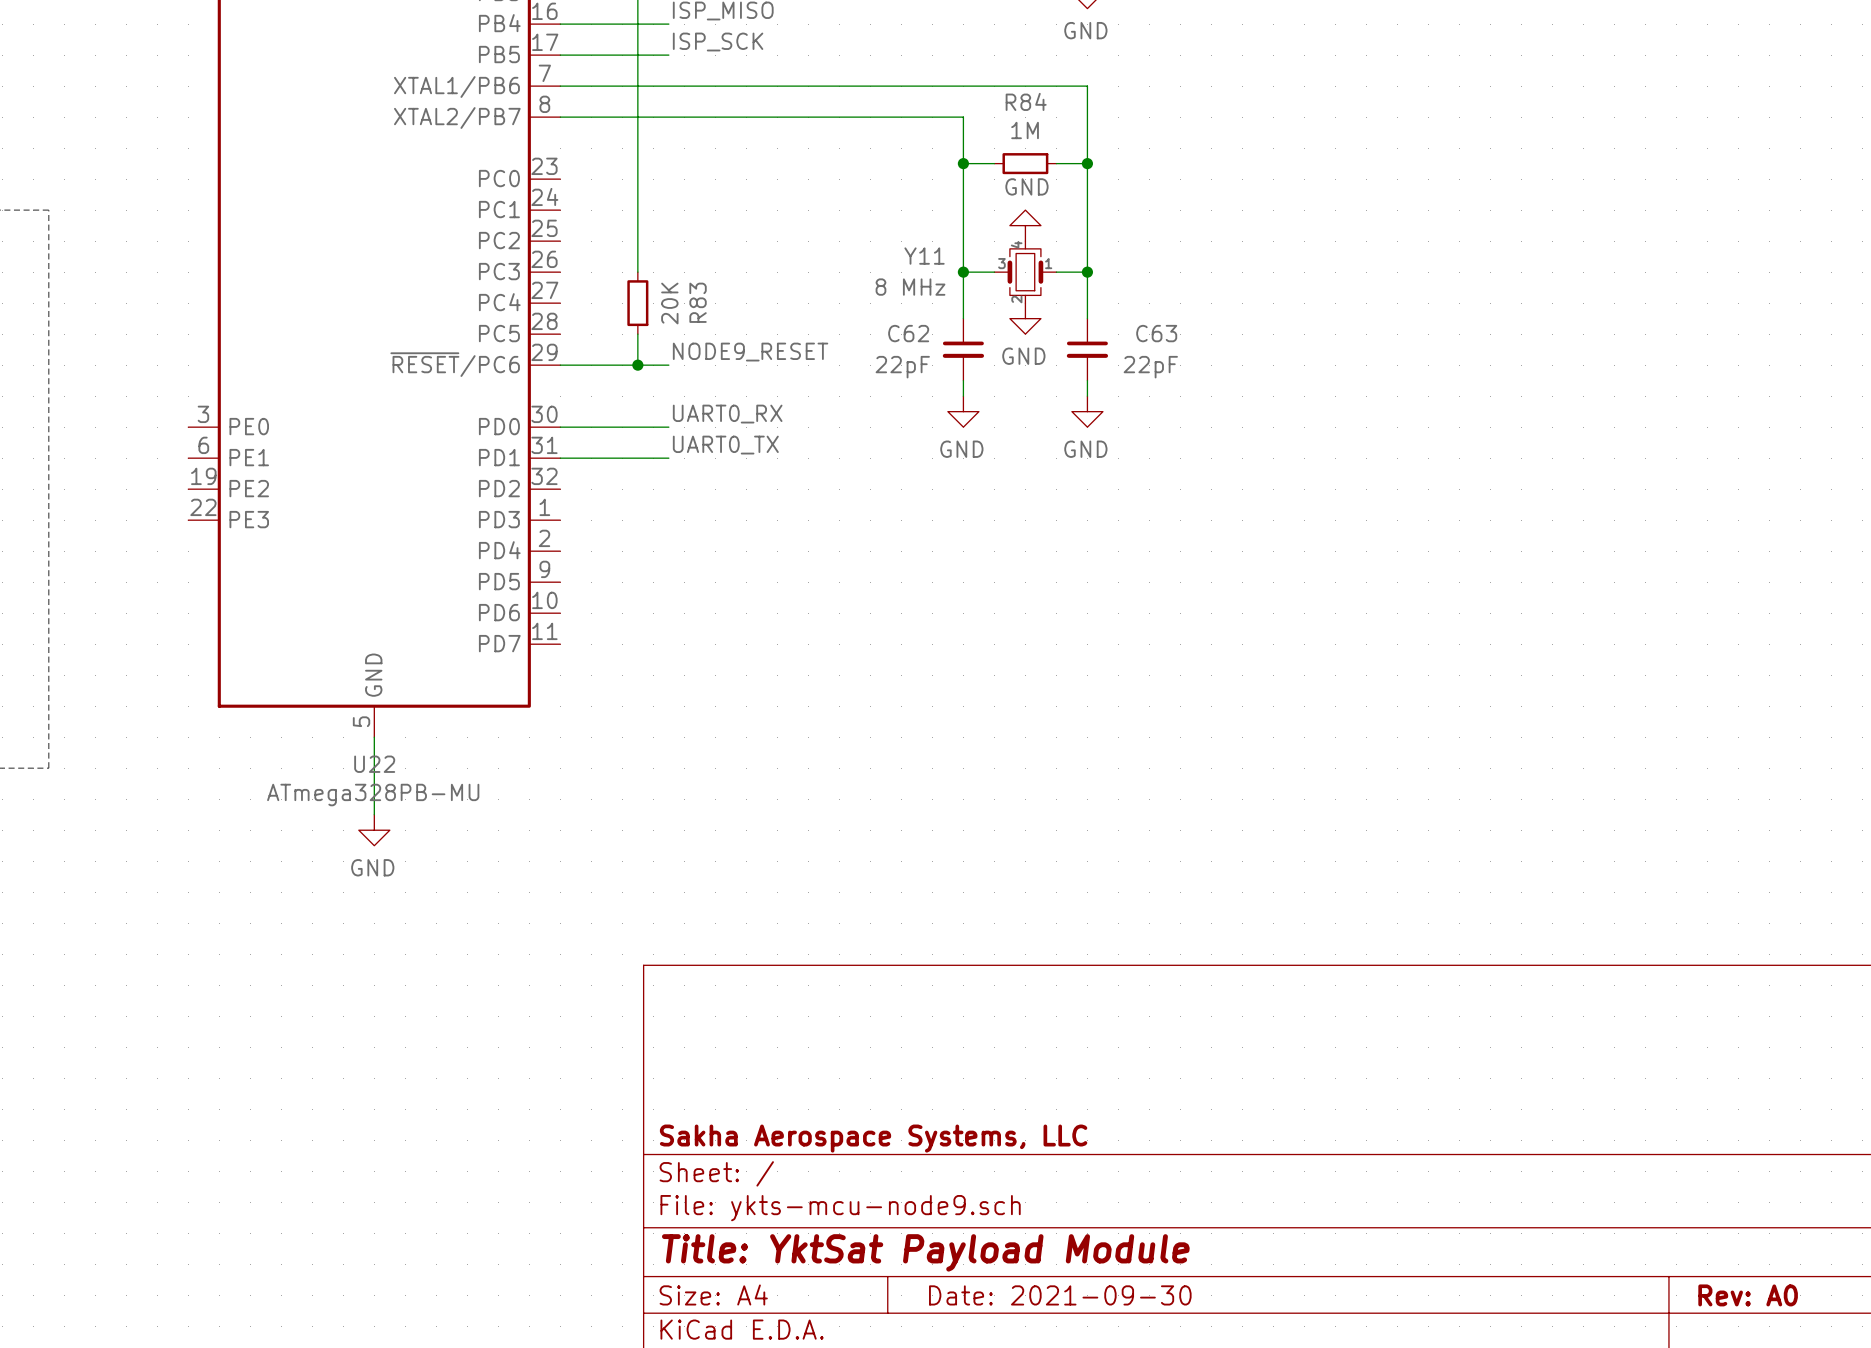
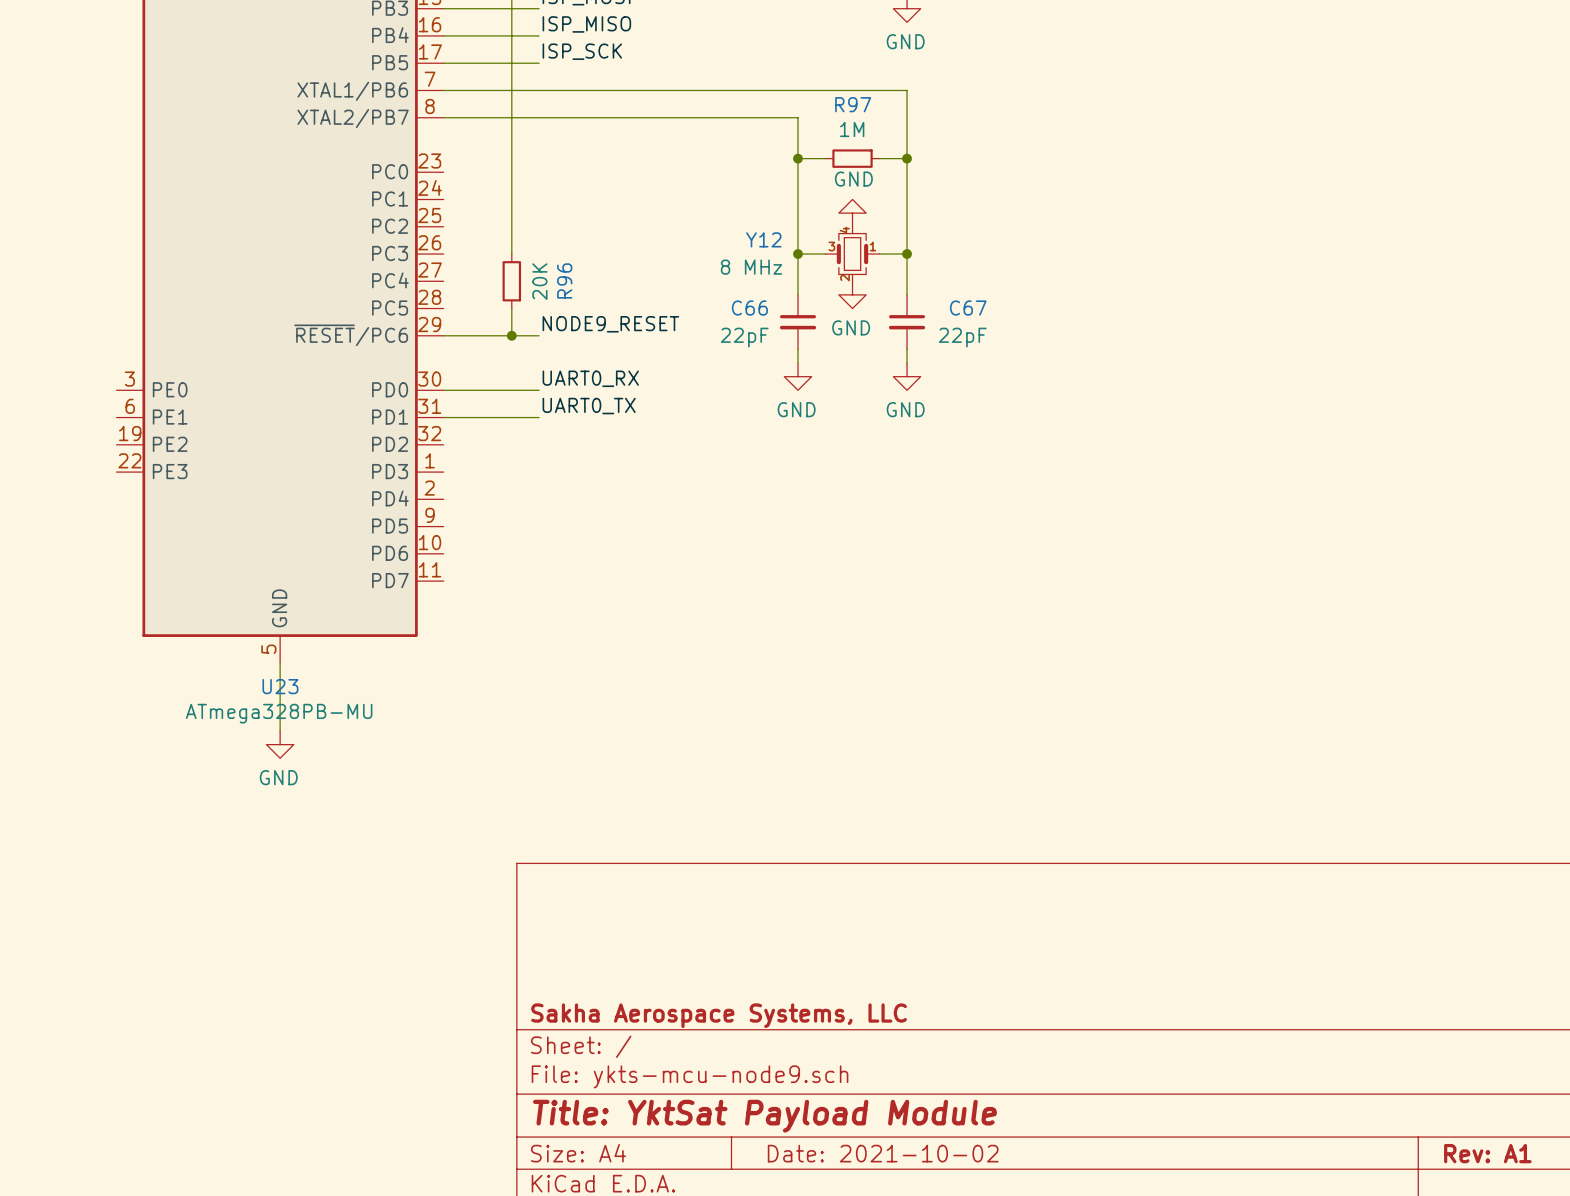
R84 name: R84 (1026, 101) -> R97 (853, 104)
Y11 name: Y11 (924, 256) -> Y12 (763, 239)
R83 name: R83 (698, 302) -> R96 (564, 280)
C62 name: C62 (908, 333) -> C66 (749, 308)
C63 name: C63 (1156, 333) -> C67 (968, 308)
U22 name: U22 (374, 764) -> U23 (280, 686)
title block: Date: 2021-09-30 (1060, 1295) -> Date: 2021-10-02 (883, 1153)
title block: Rev: A0 (1748, 1295) -> Rev: A1 (1487, 1153)

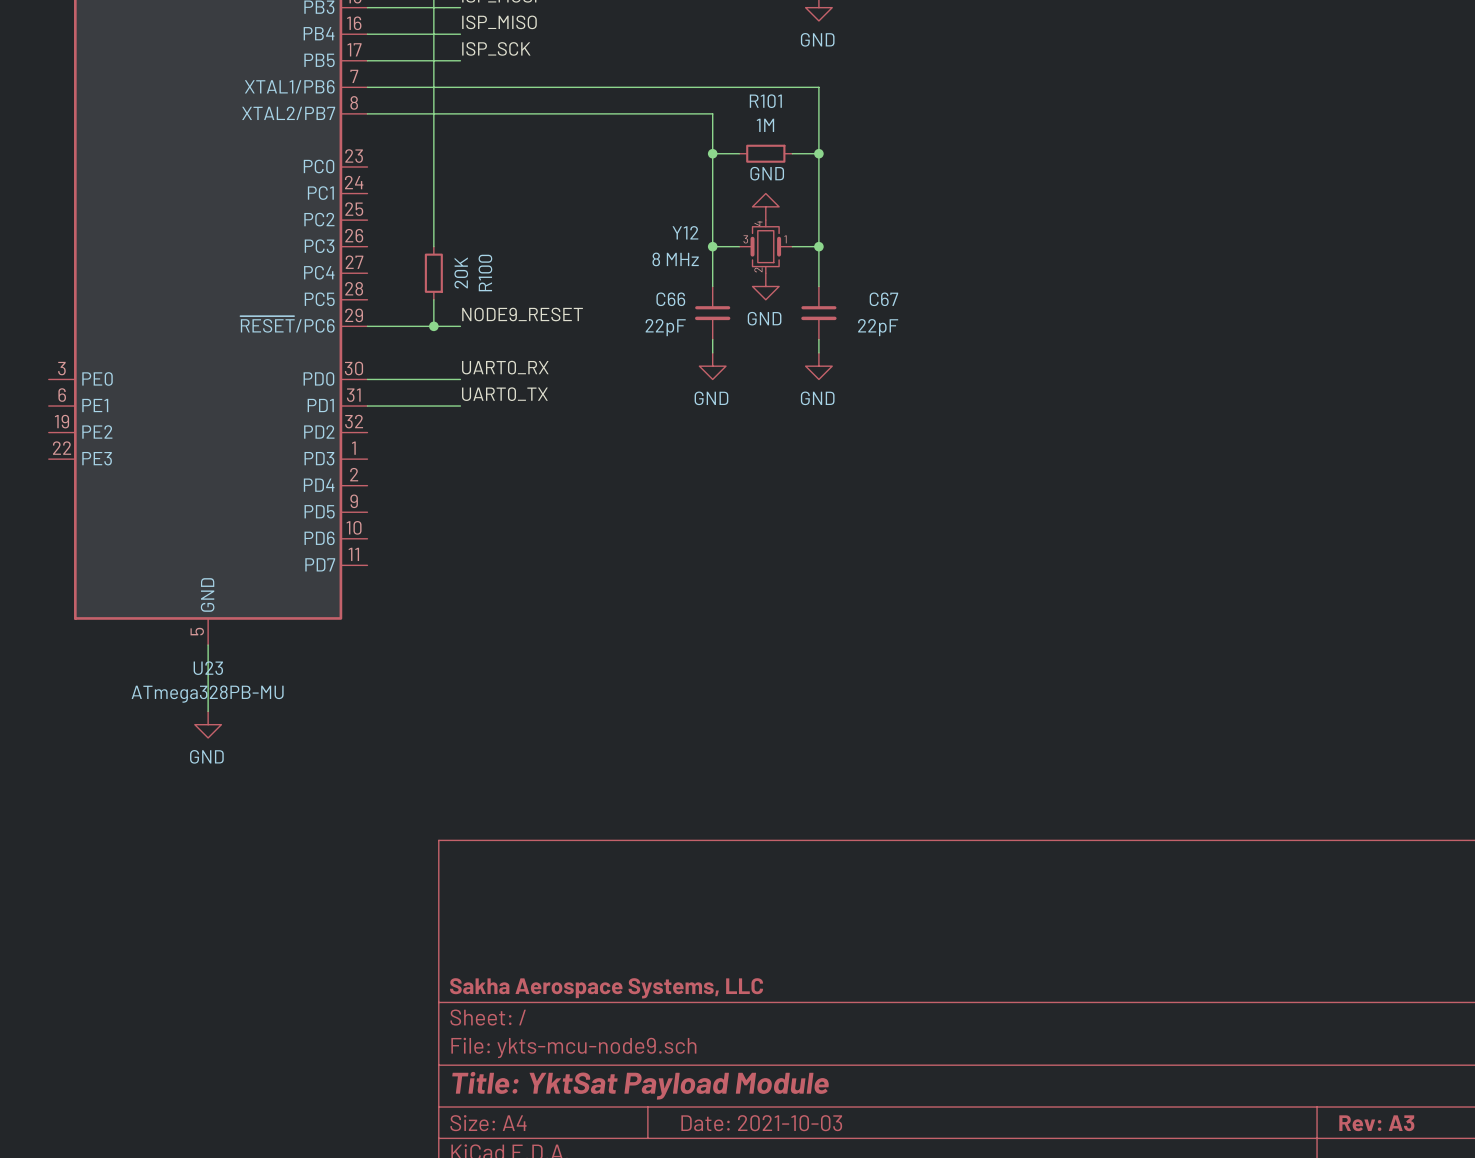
R97 name: R97 (853, 104) -> R101 (765, 101)
R96 name: R96 (564, 280) -> R100 (485, 273)
title block: Date: 2021-10-02 (883, 1153) -> Date: 2021-10-03 (761, 1123)
title block: Rev: A1 (1487, 1153) -> Rev: A3 (1376, 1123)

